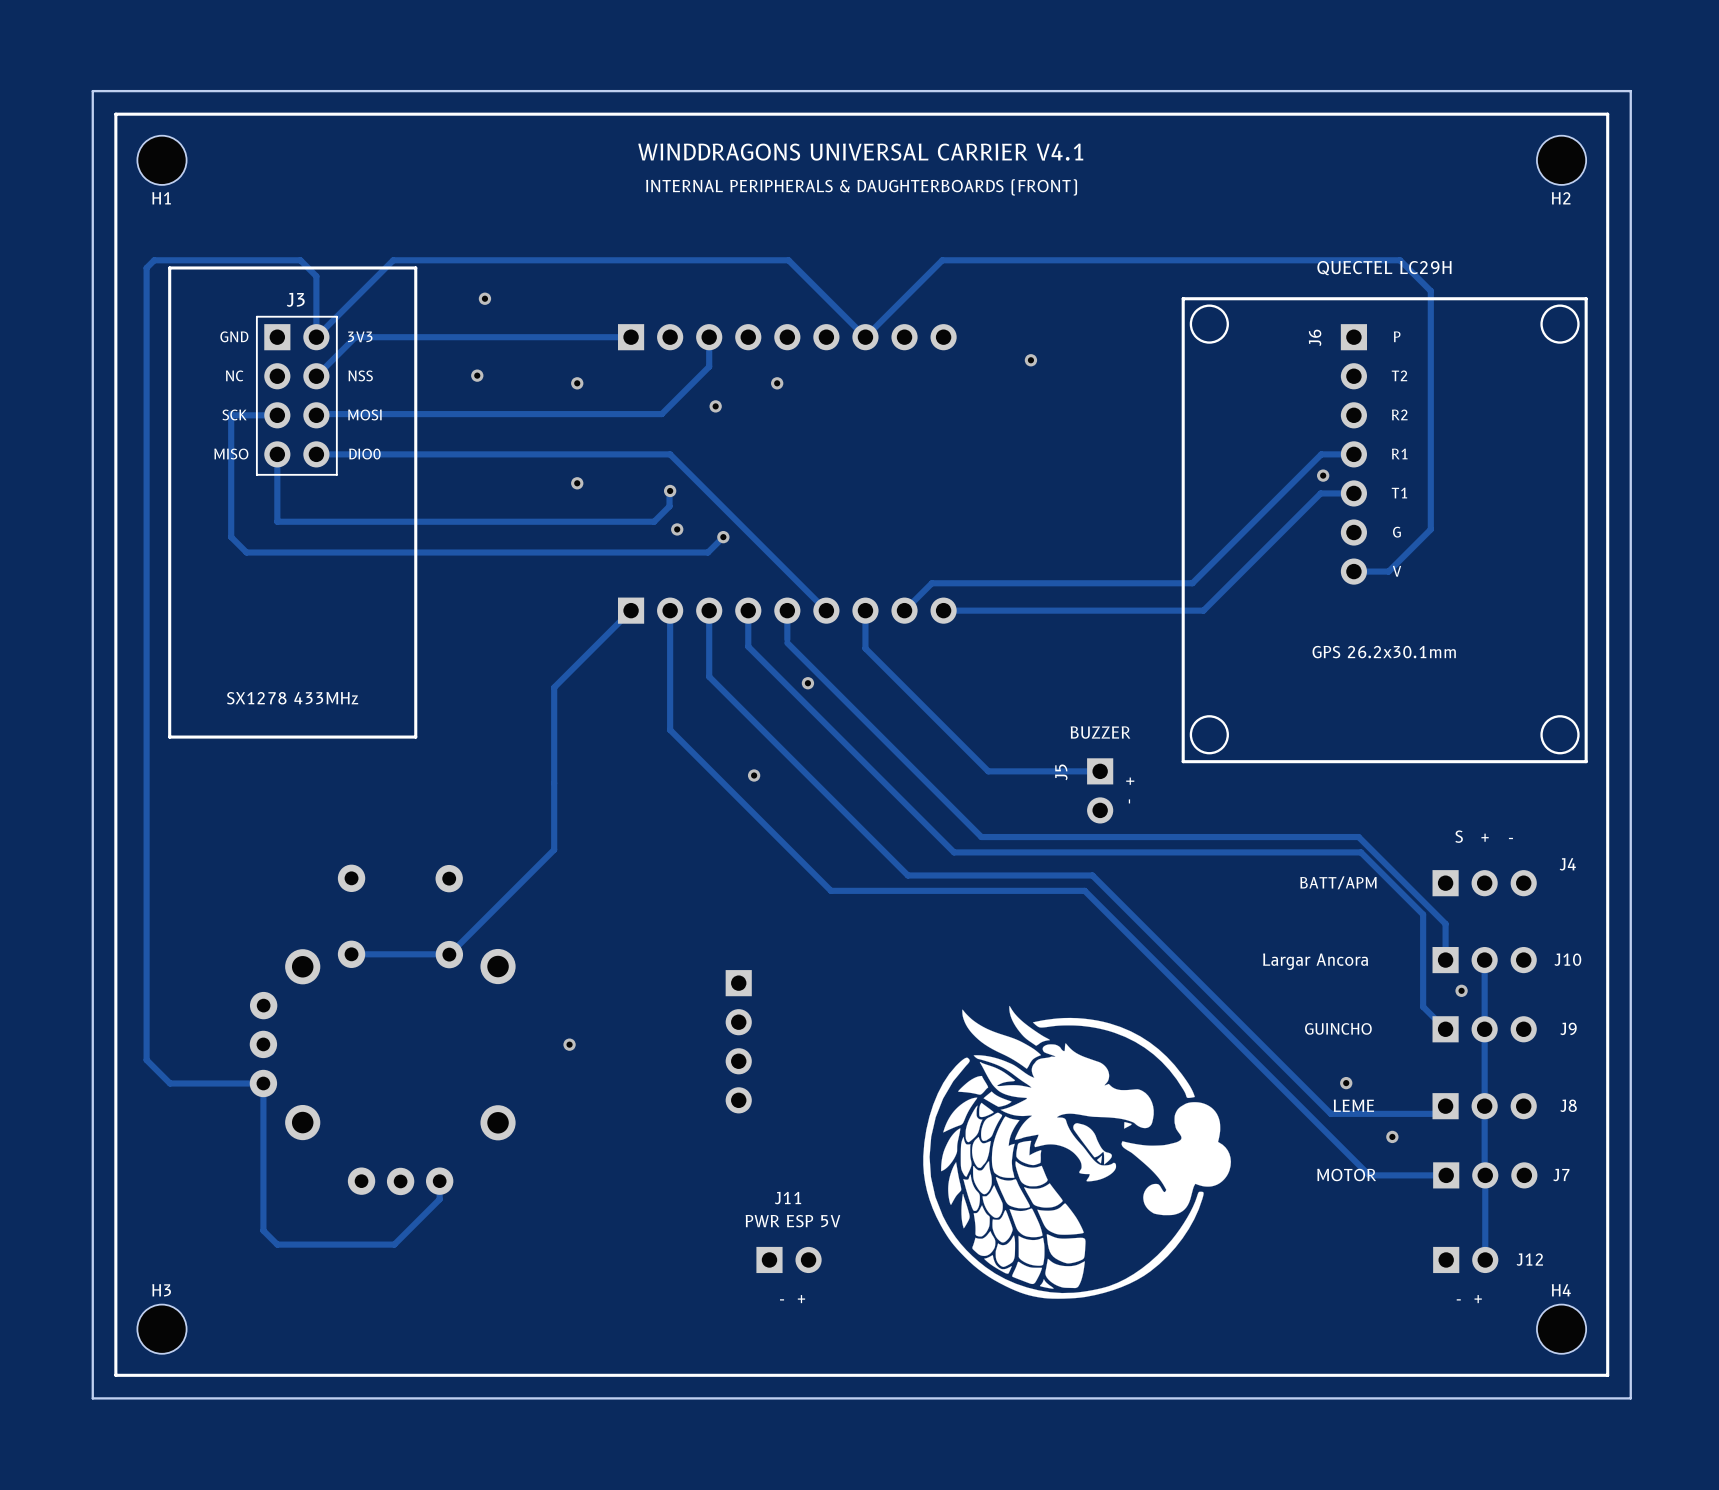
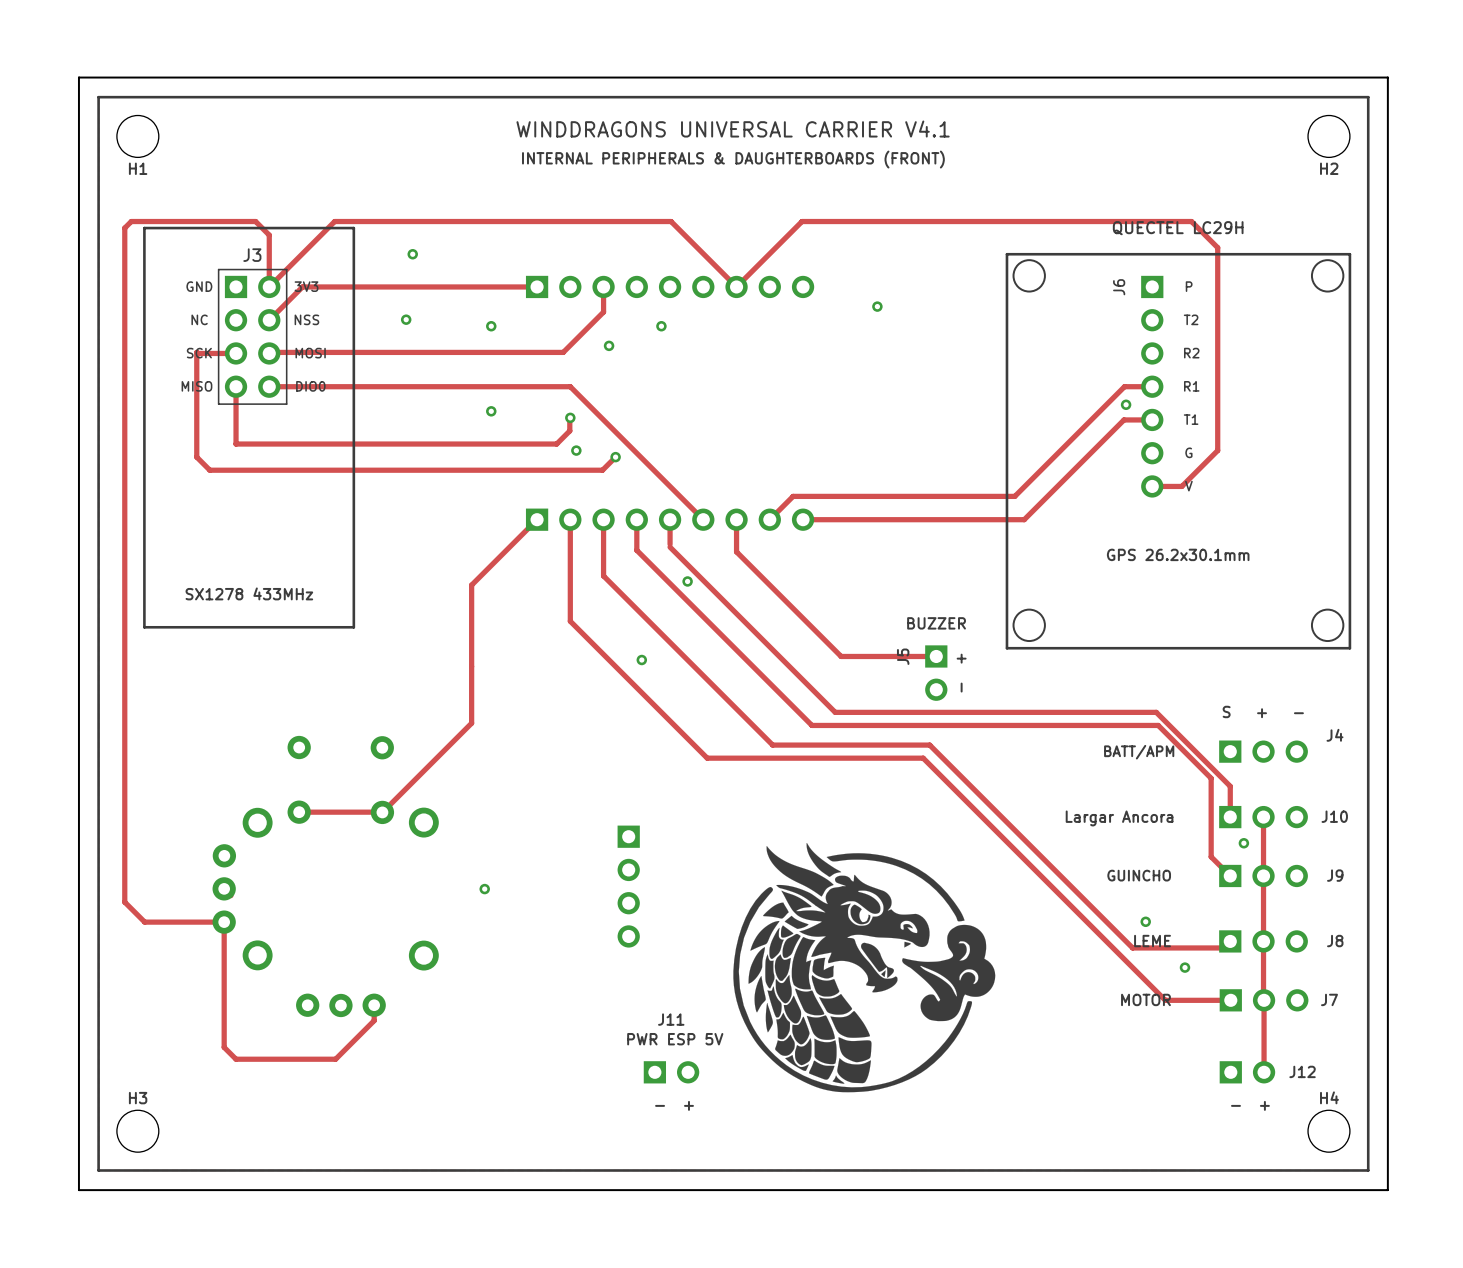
drawing: none -> [733, 842, 996, 1093]
drawing: [923, 1005, 1231, 1299] -> none

